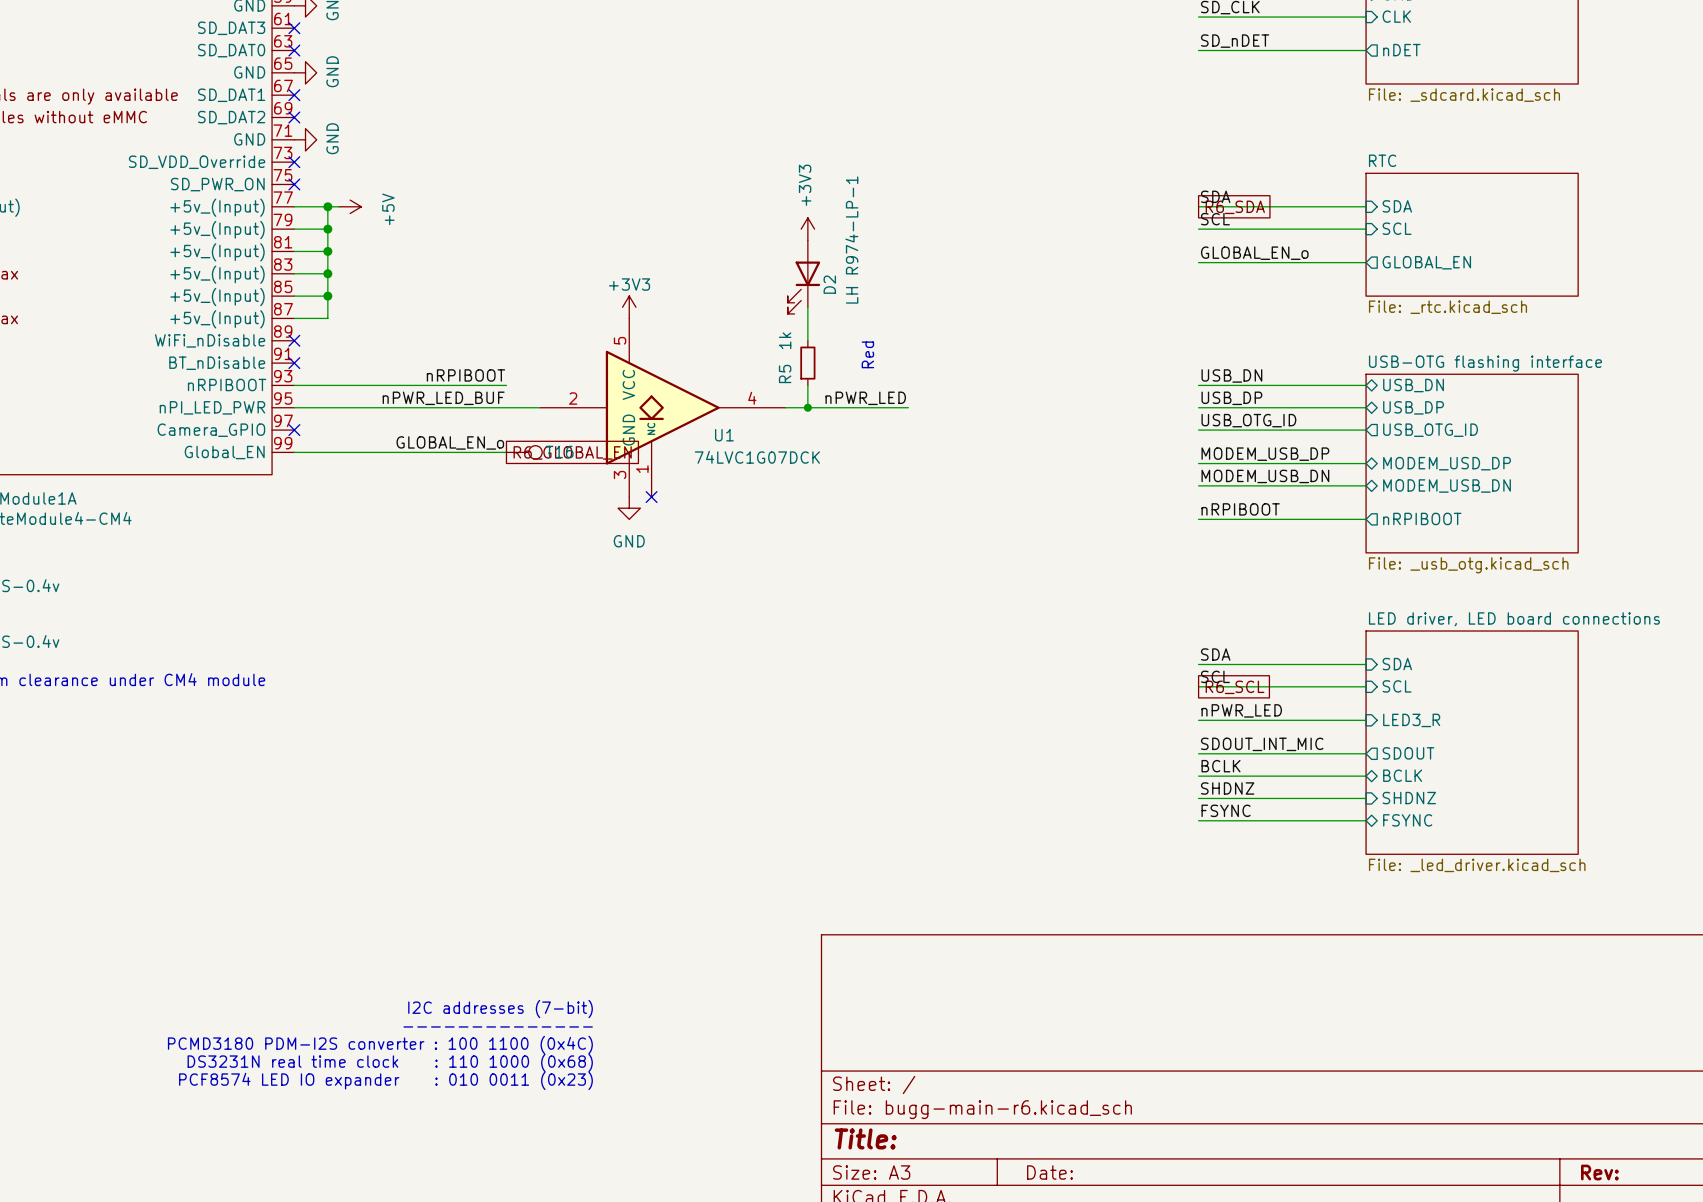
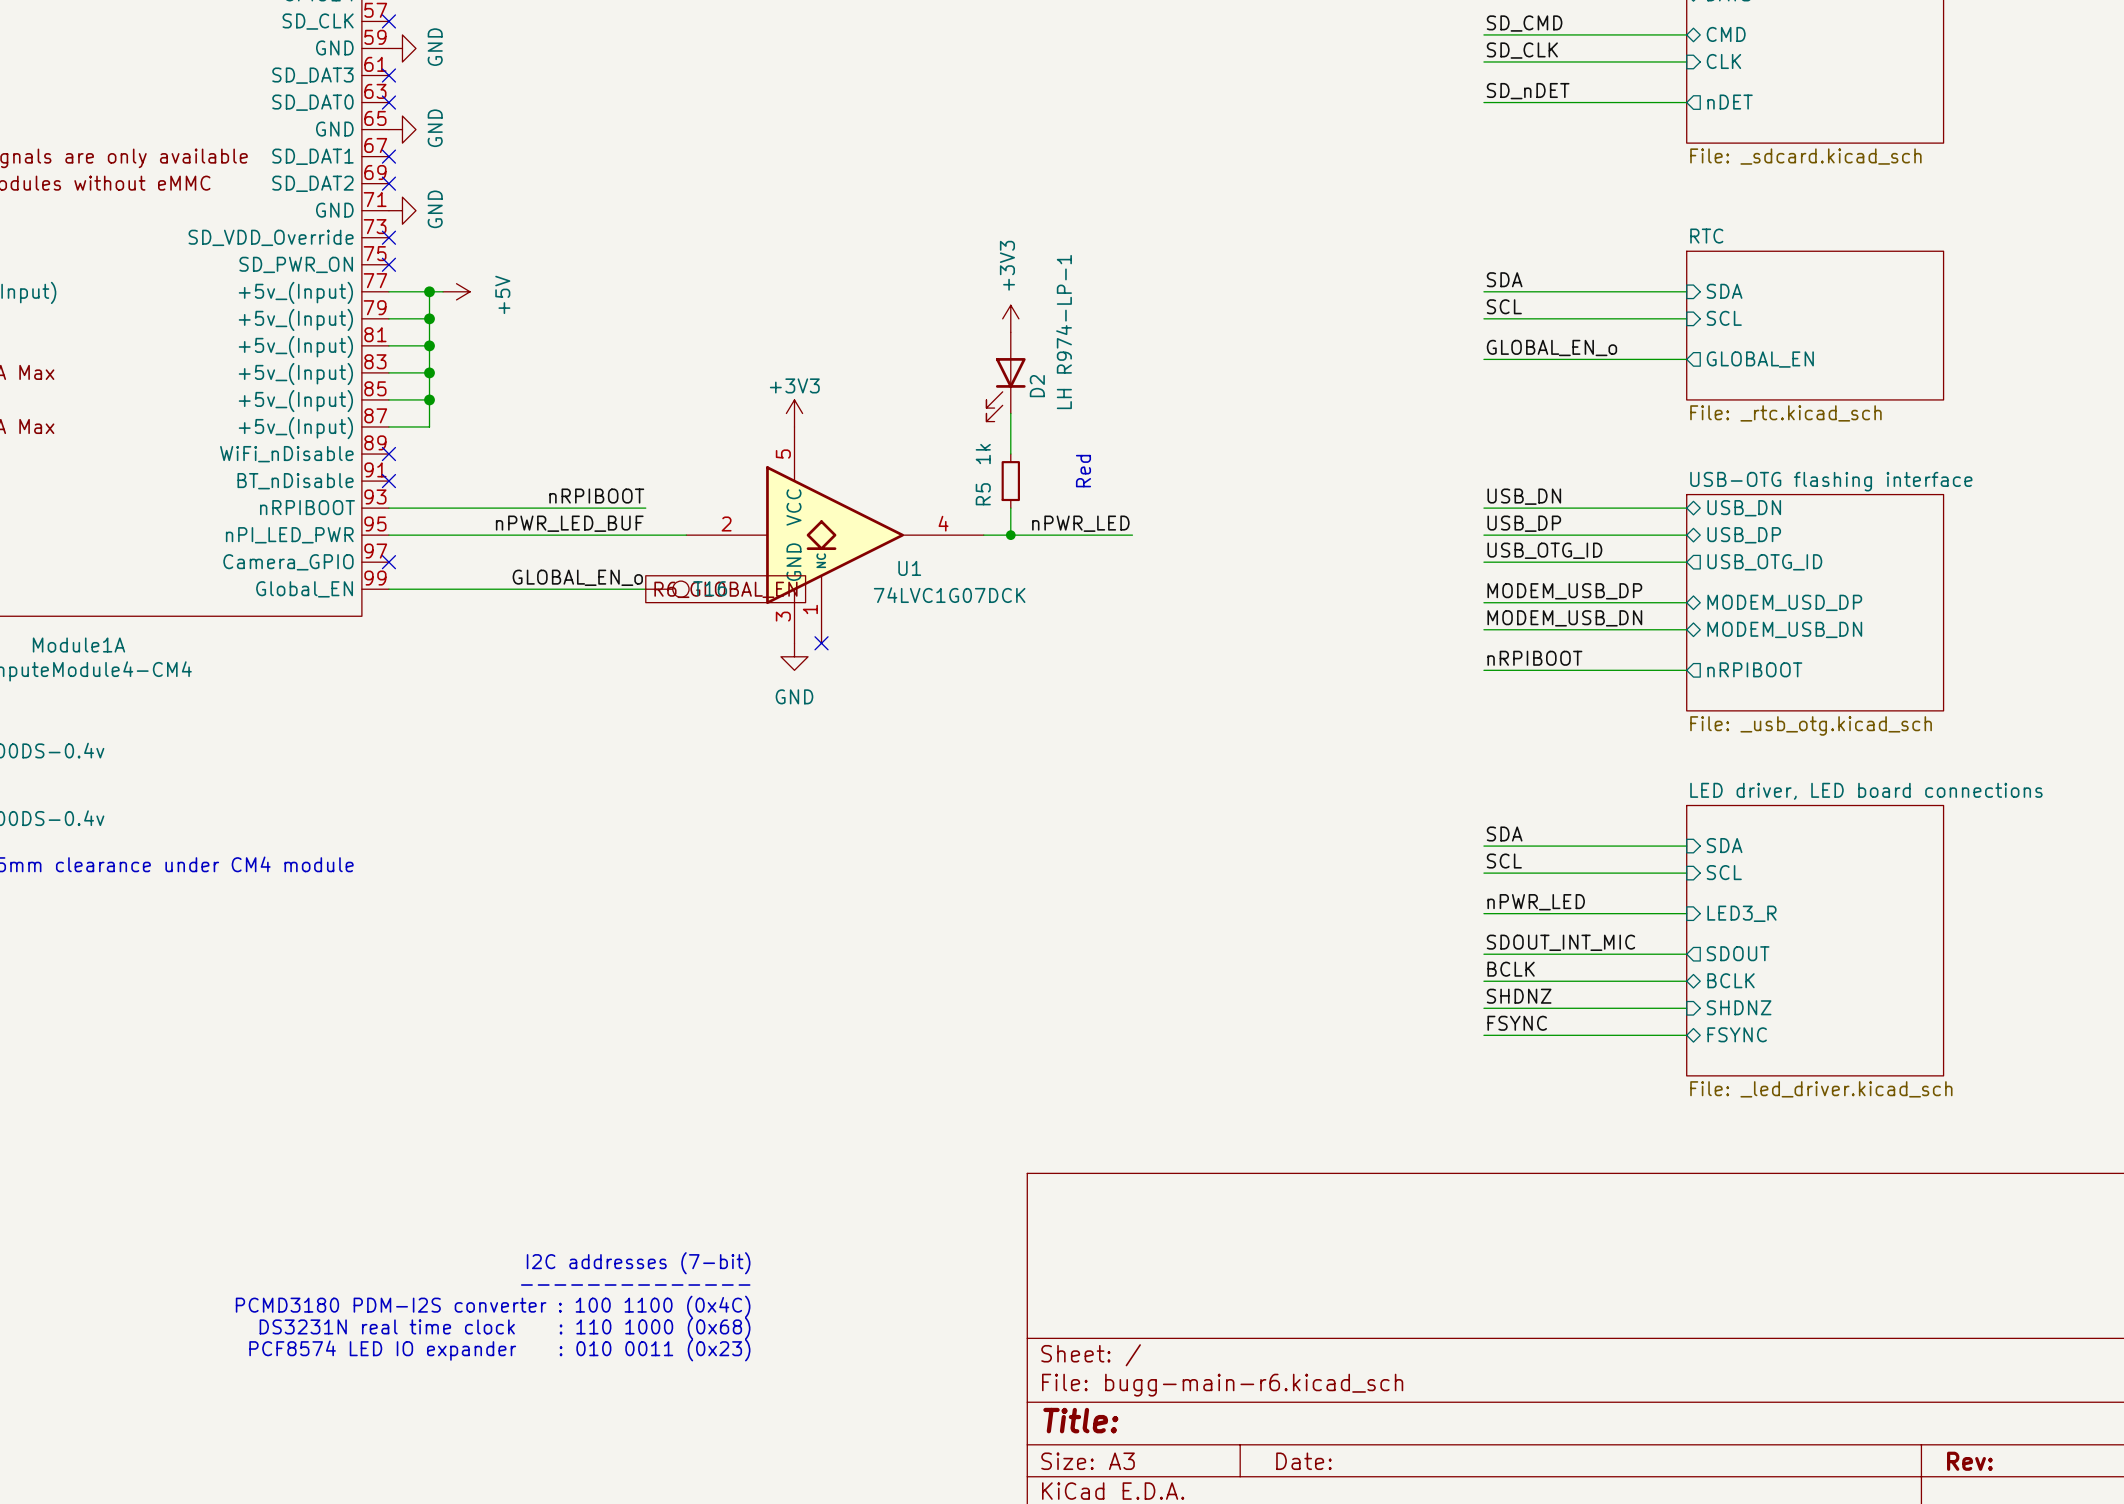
global label: R6_SDA (1235, 207) -> none
global label: R6_SCL (1235, 687) -> none

